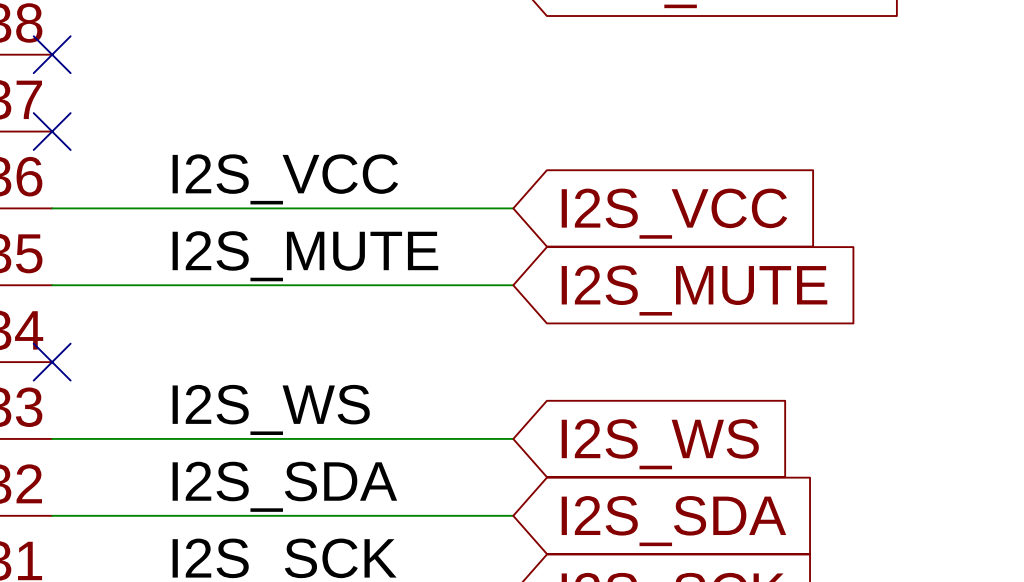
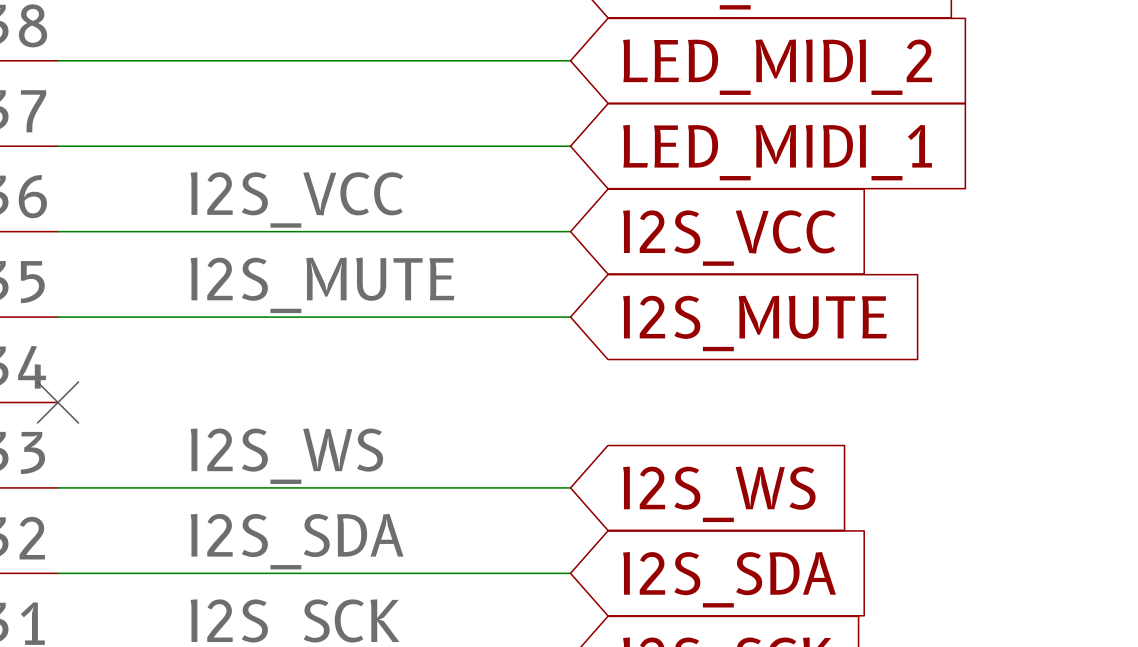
wire: none -> (57, 60) (570, 60)
no-connect mark: (52, 54) -> none
global label: none -> LED_MIDI_2 (777, 67)
wire: none -> (57, 146) (570, 146)
no-connect mark: (52, 131) -> none
global label: none -> LED_MIDI_1 (777, 152)

